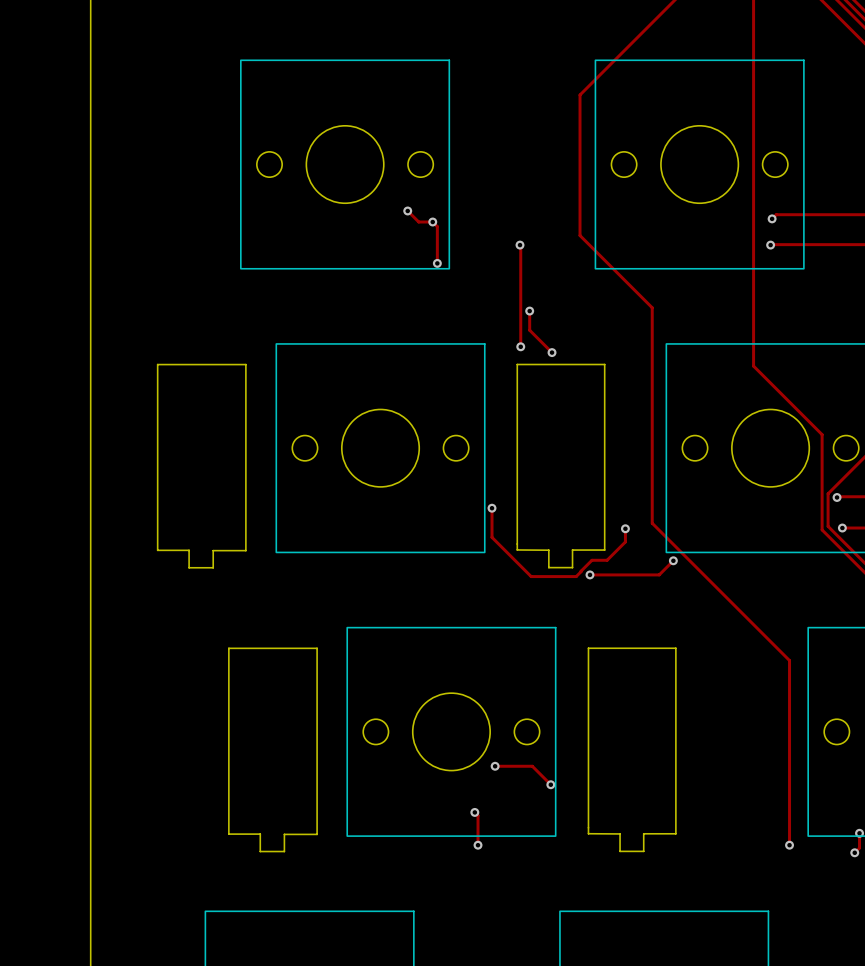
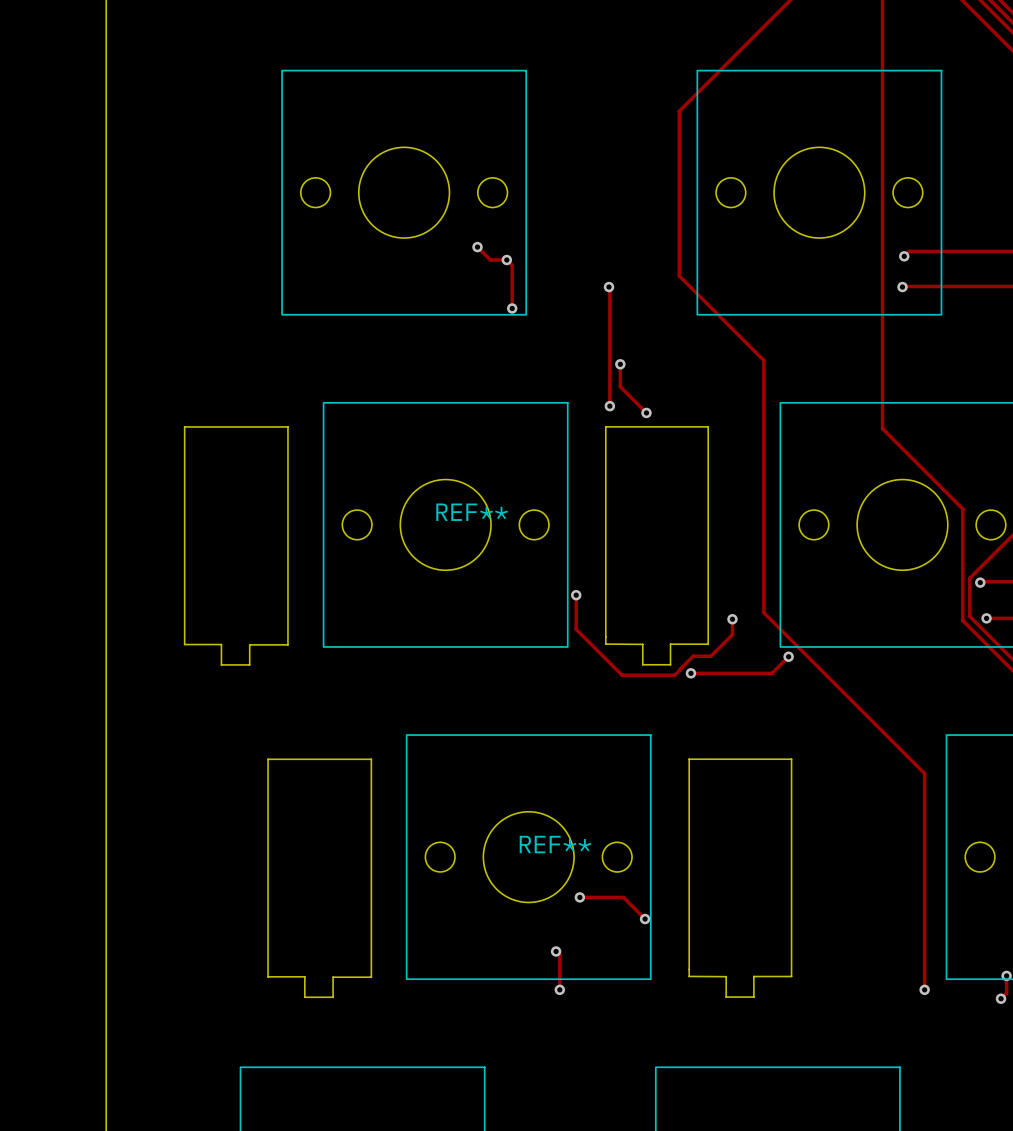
REF**: none -> (446, 545)
REF**: none -> (529, 878)

